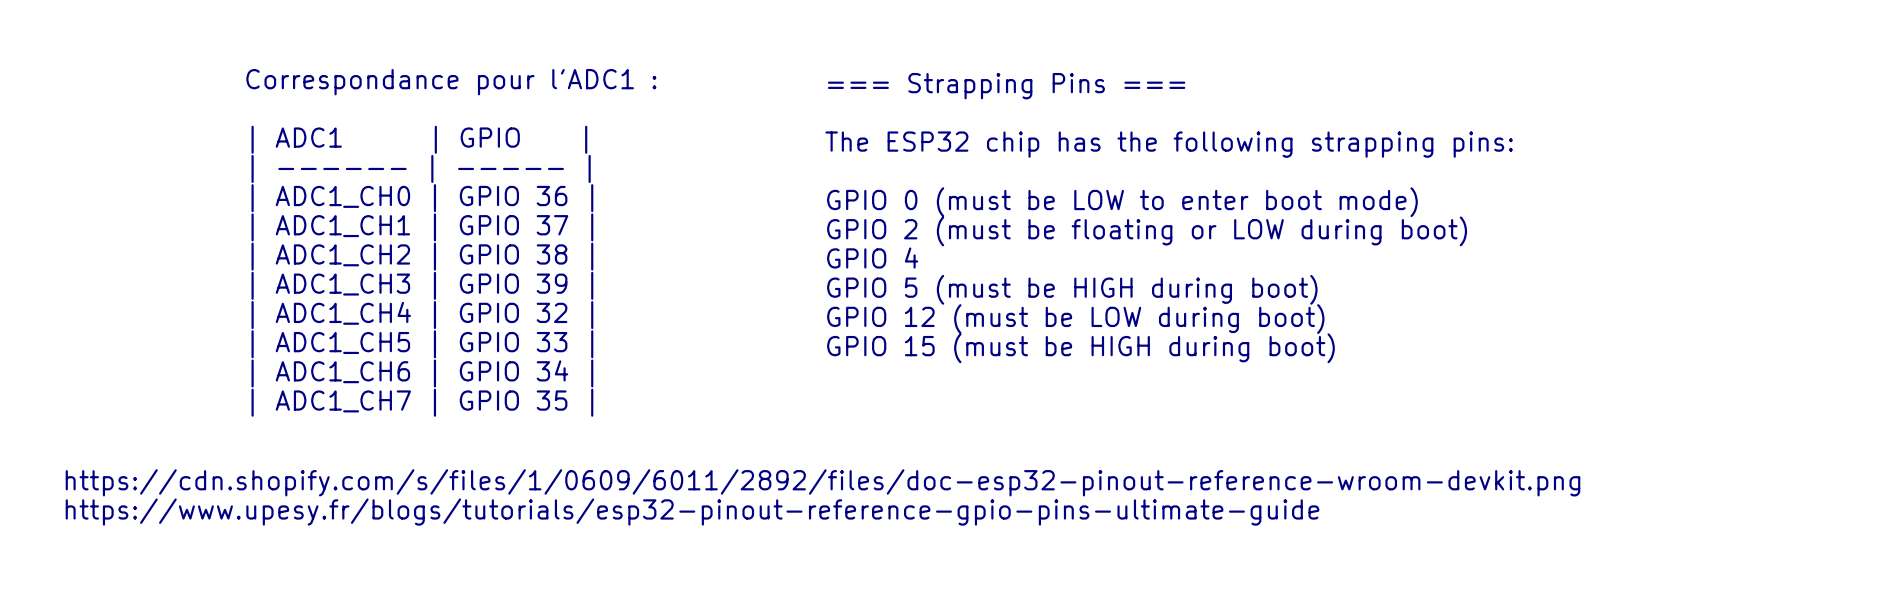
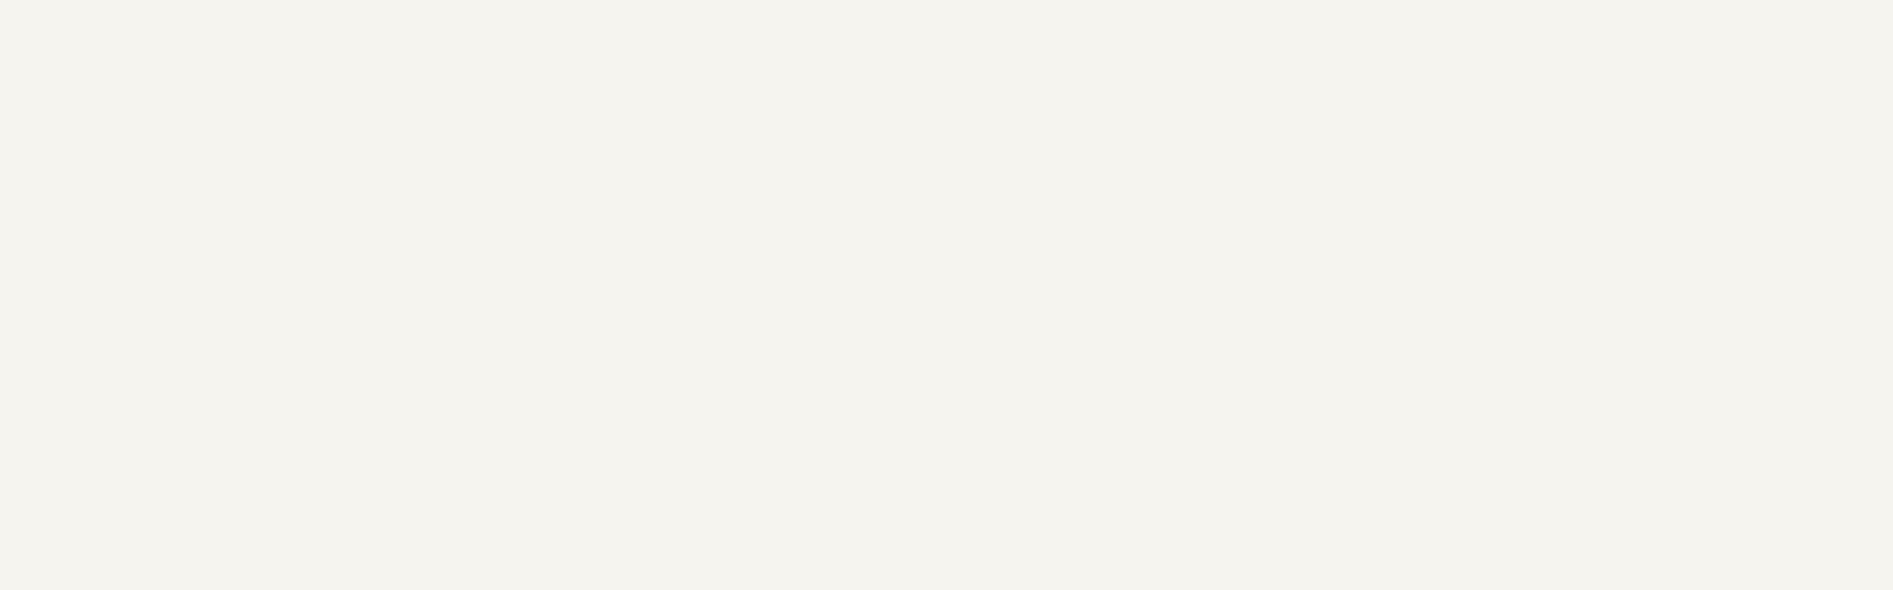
text: Correspondance pour l'ADC1 : (451, 82) -> none
text: === Strapping Pins === (1006, 86) -> none
text: | ADC1 | GPIO | (419, 139) -> none
text: The ESP32 chip has the following strapping pins: (1169, 144) -> none
text: | ------ | ----- | (421, 168) -> none
text: | ADC1_CH0 | GPIO 36 | (422, 198) -> none
text: GPIO 0 (must be LOW to enter boot mode) (1122, 202) -> none
text: | ADC1_CH1 | GPIO 37 | (422, 227) -> none
text: GPIO 2 (must be floating or LOW during boot) (1147, 231) -> none
text: | ADC1_CH2 | GPIO 38 | (422, 256) -> none
text: GPIO 4 (872, 258) -> none
text: | ADC1_CH3 | GPIO 39 | (422, 285) -> none
text: GPIO 5 (must be HIGH during boot) (1072, 289) -> none
text: | ADC1_CH4 | GPIO 32 | (422, 315) -> none
text: GPIO 12 (must be LOW during boot) (1075, 319) -> none
text: | ADC1_CH5 | GPIO 33 | (422, 344) -> none
text: GPIO 15 (must be HIGH during boot) (1080, 348) -> none
text: | ADC1_CH6 | GPIO 34 | (422, 373) -> none
text: | ADC1_CH7 | GPIO 35 | (422, 402) -> none
text: https://cdn.shopify.com/s/files/1/0609/6011/2892/files/doc-esp32-pinout-reference-wroom-devkit.png (822, 482) -> none
text: https://www.upesy.fr/blogs/tutorials/esp32-pinout-reference-gpio-pins-ultimate-guide (692, 512) -> none

